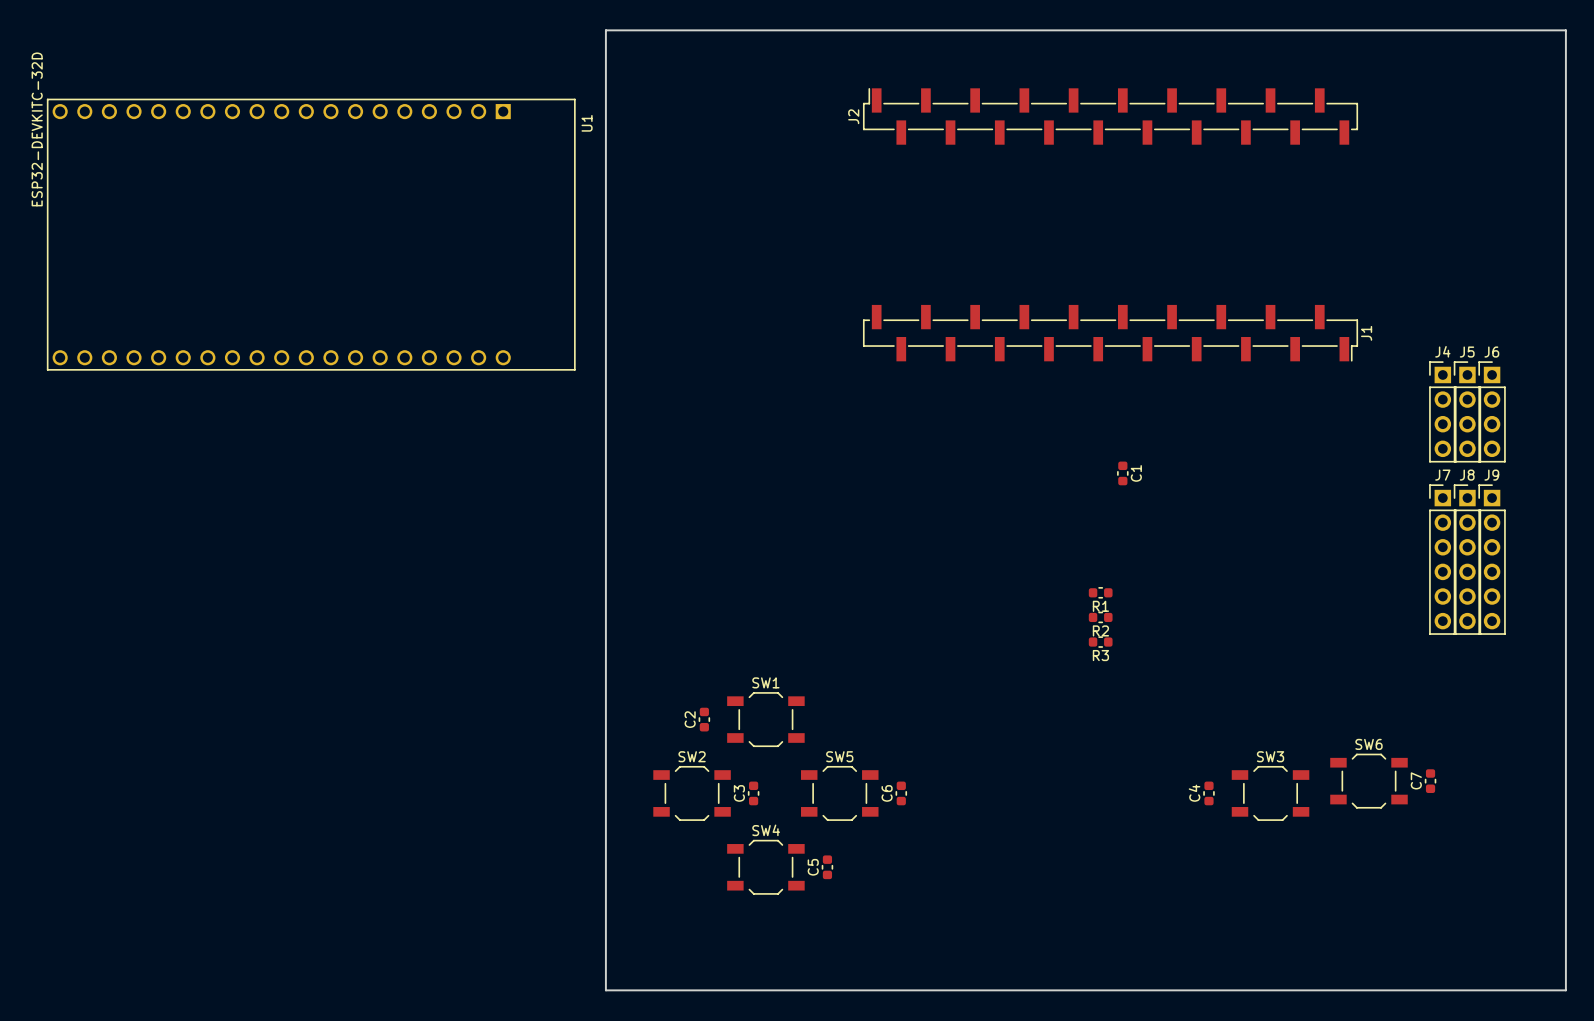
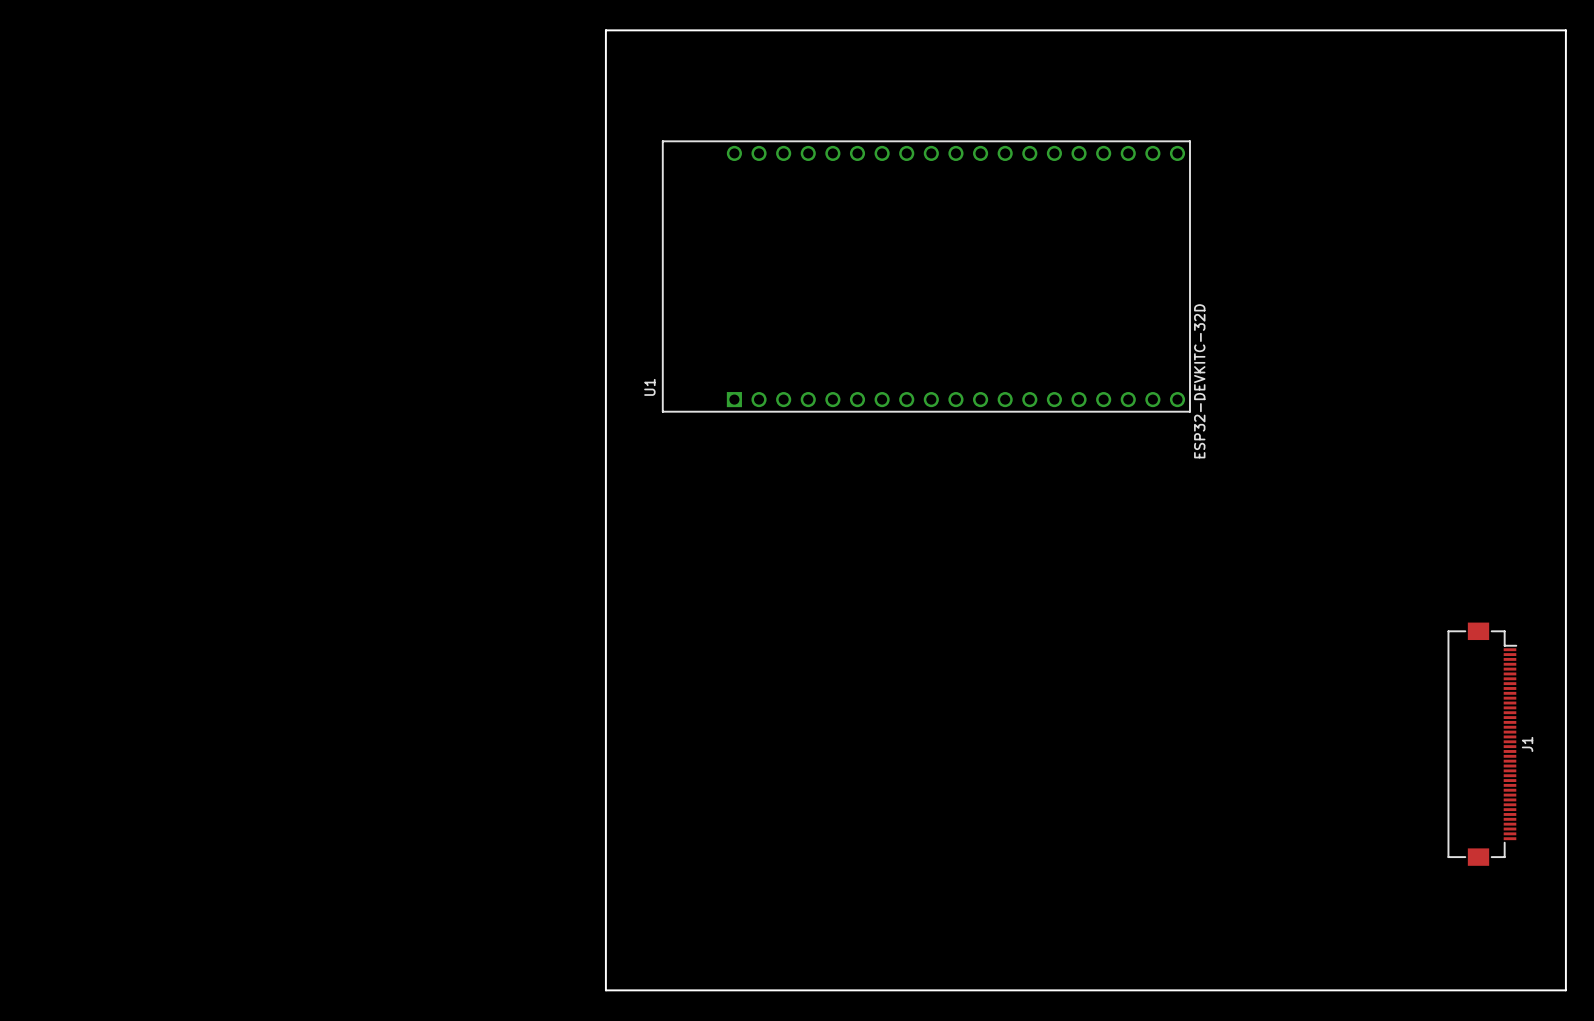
J2: (1110, 116) -> none
U1 rotation: 0° (311, 234) -> 180° (926, 276)
U1 position: (311, 234) -> (926, 276)
J1 footprint: [863, 304, 1358, 362] -> [1447, 622, 1517, 866]
J1 name position: J1 (1366, 333) -> J1 (1527, 744)
J4: (1442, 411) -> none
J5: (1467, 411) -> none
J6: (1492, 411) -> none
C1: (1122, 473) -> none
J7: (1442, 559) -> none
J8: (1467, 559) -> none
J9: (1492, 559) -> none
R1: (1100, 592) -> none
R2: (1100, 617) -> none
R3: (1100, 642) -> none
C2: (704, 719) -> none
SW1: (765, 719) -> none
SW6: (1368, 781) -> none
C7: (1430, 781) -> none
SW2: (692, 793) -> none
C3: (753, 793) -> none
SW5: (839, 793) -> none
C6: (901, 793) -> none
C4: (1208, 793) -> none
SW3: (1270, 793) -> none
SW4: (765, 867) -> none
C5: (827, 867) -> none

